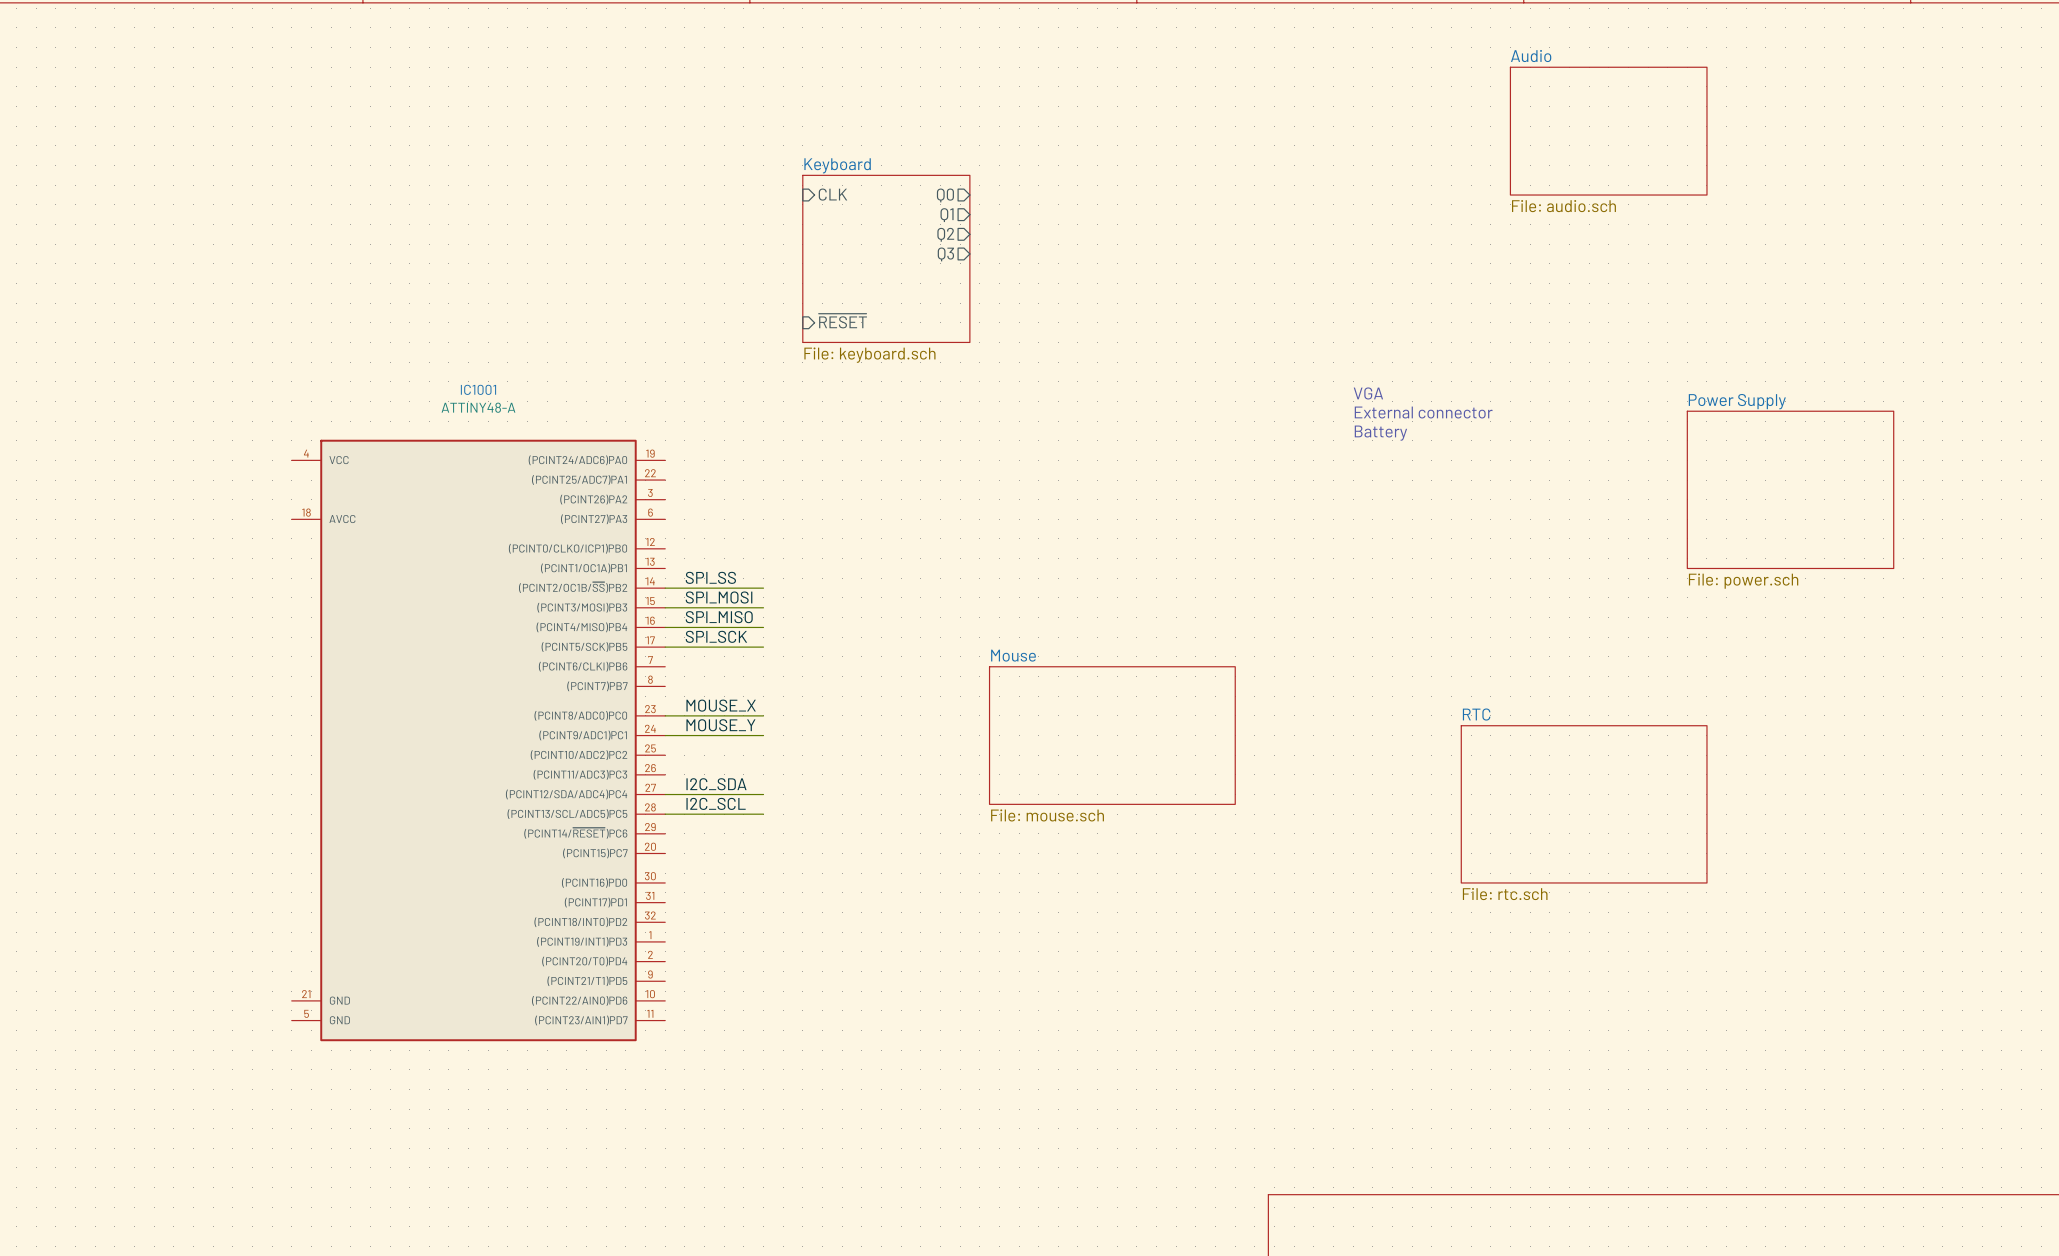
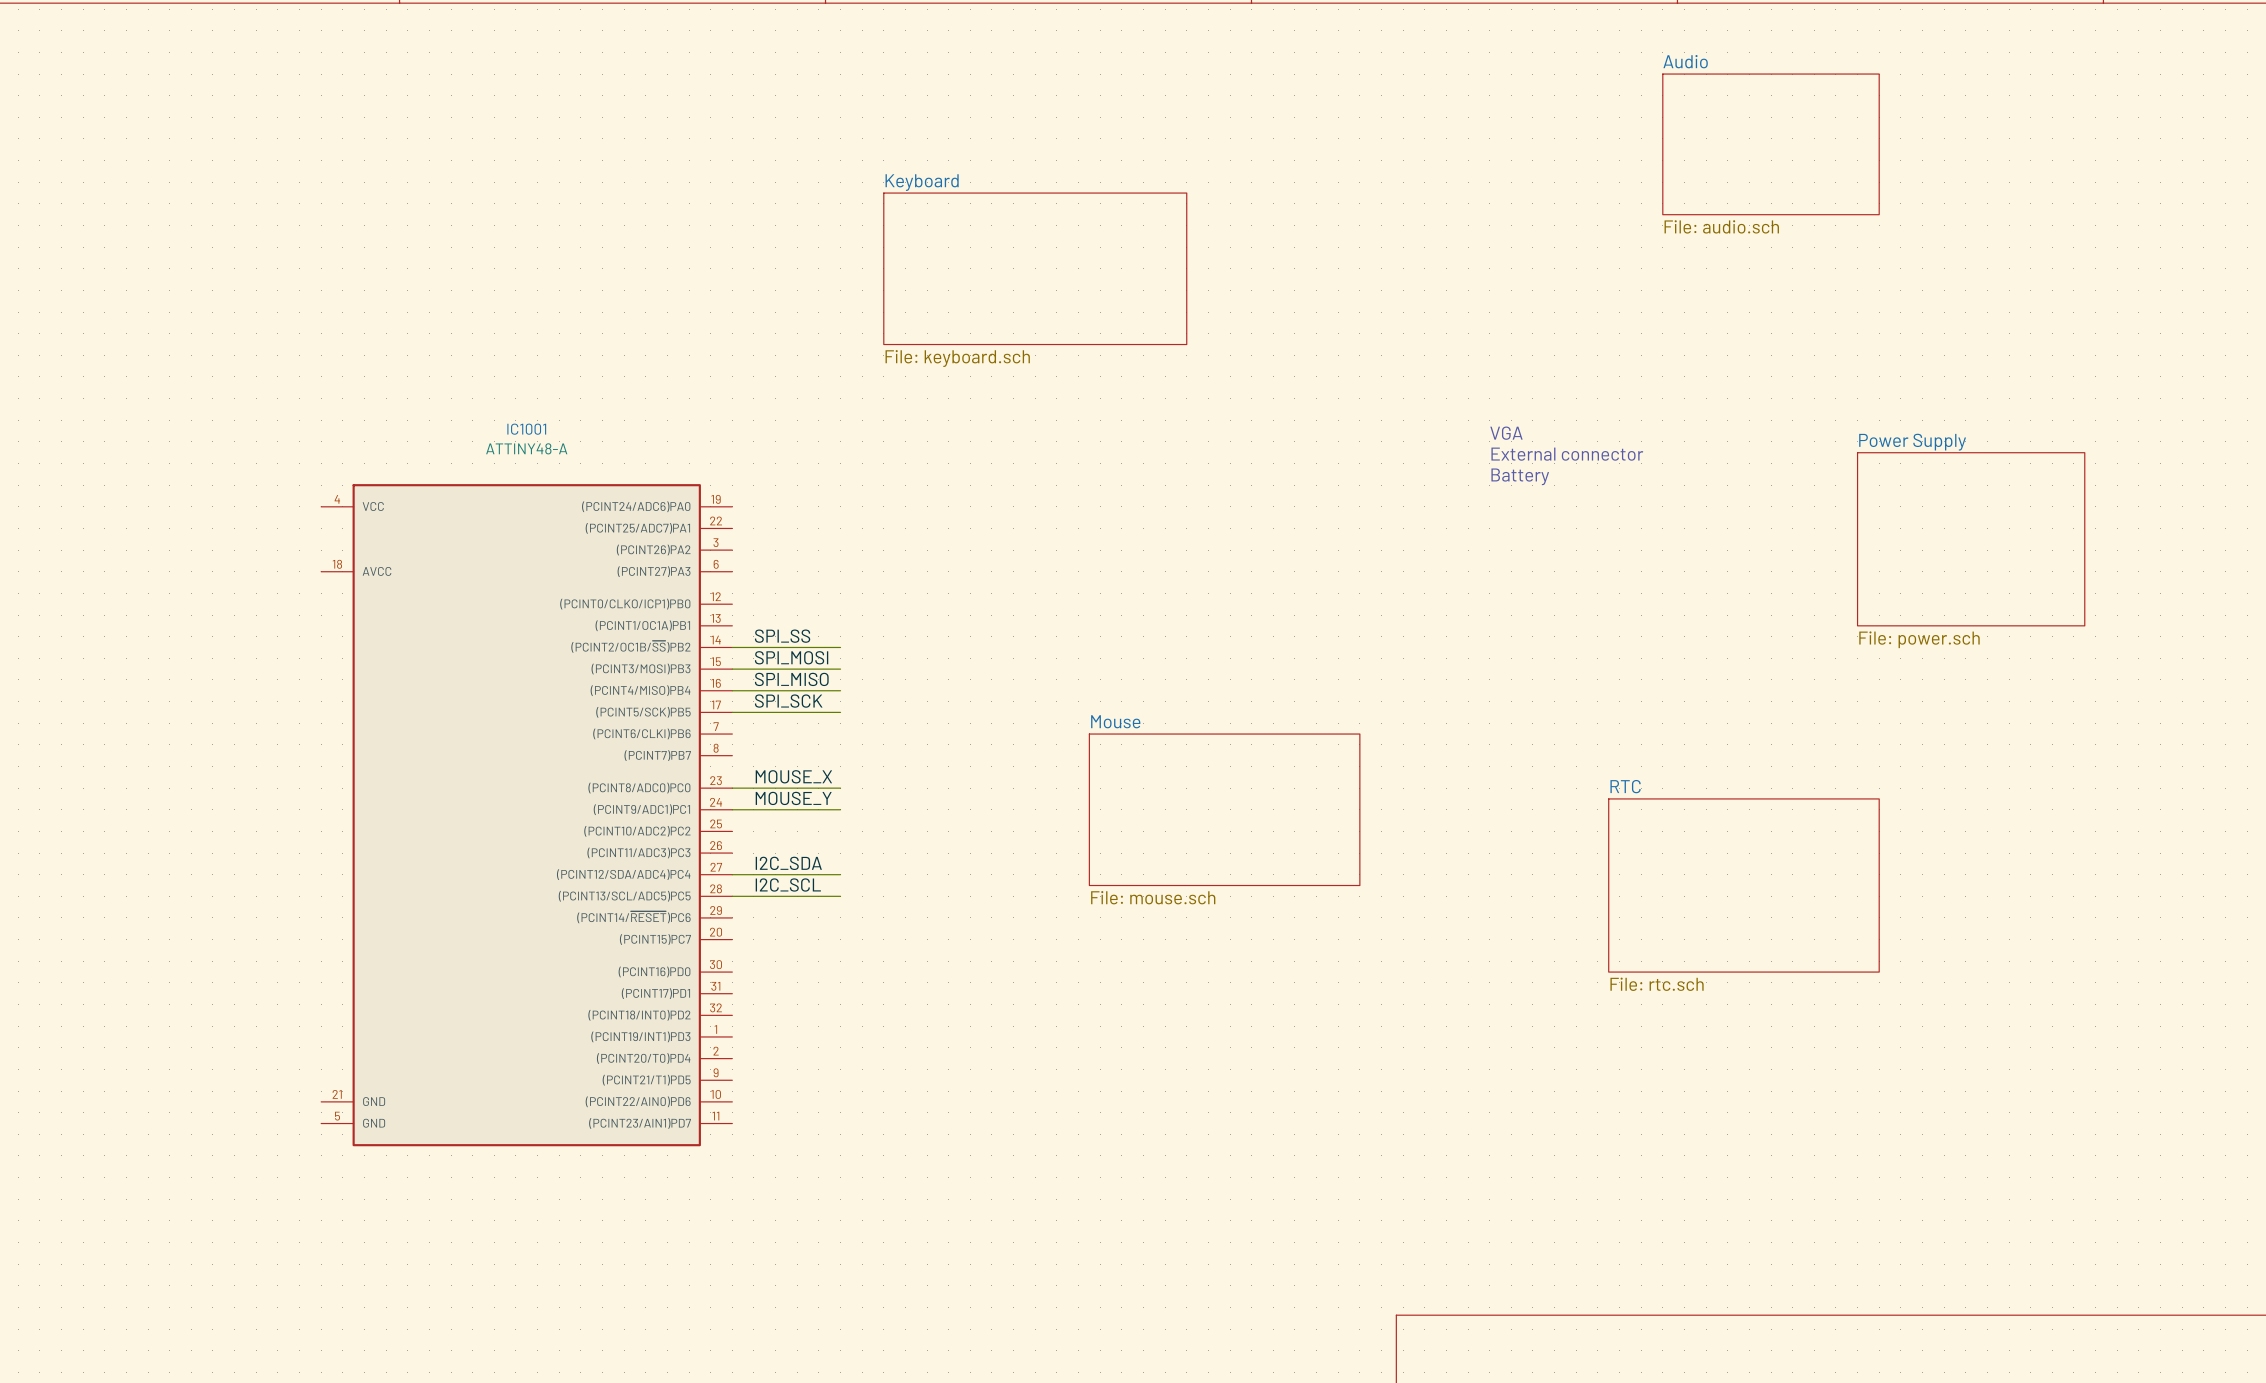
sheet pin: CLK (832, 194) -> none
sheet pin: Q0 (945, 195) -> none
sheet pin: Q1 (947, 215) -> none
sheet pin: Q2 (945, 234) -> none
sheet Keyboard: none -> File: keyboard.sch (1035, 268)
sheet pin: Q3 (945, 254) -> none
sheet Keyboard: File: keyboard.sch (886, 258) -> none
sheet pin: ~{RESET} (842, 321) -> none

